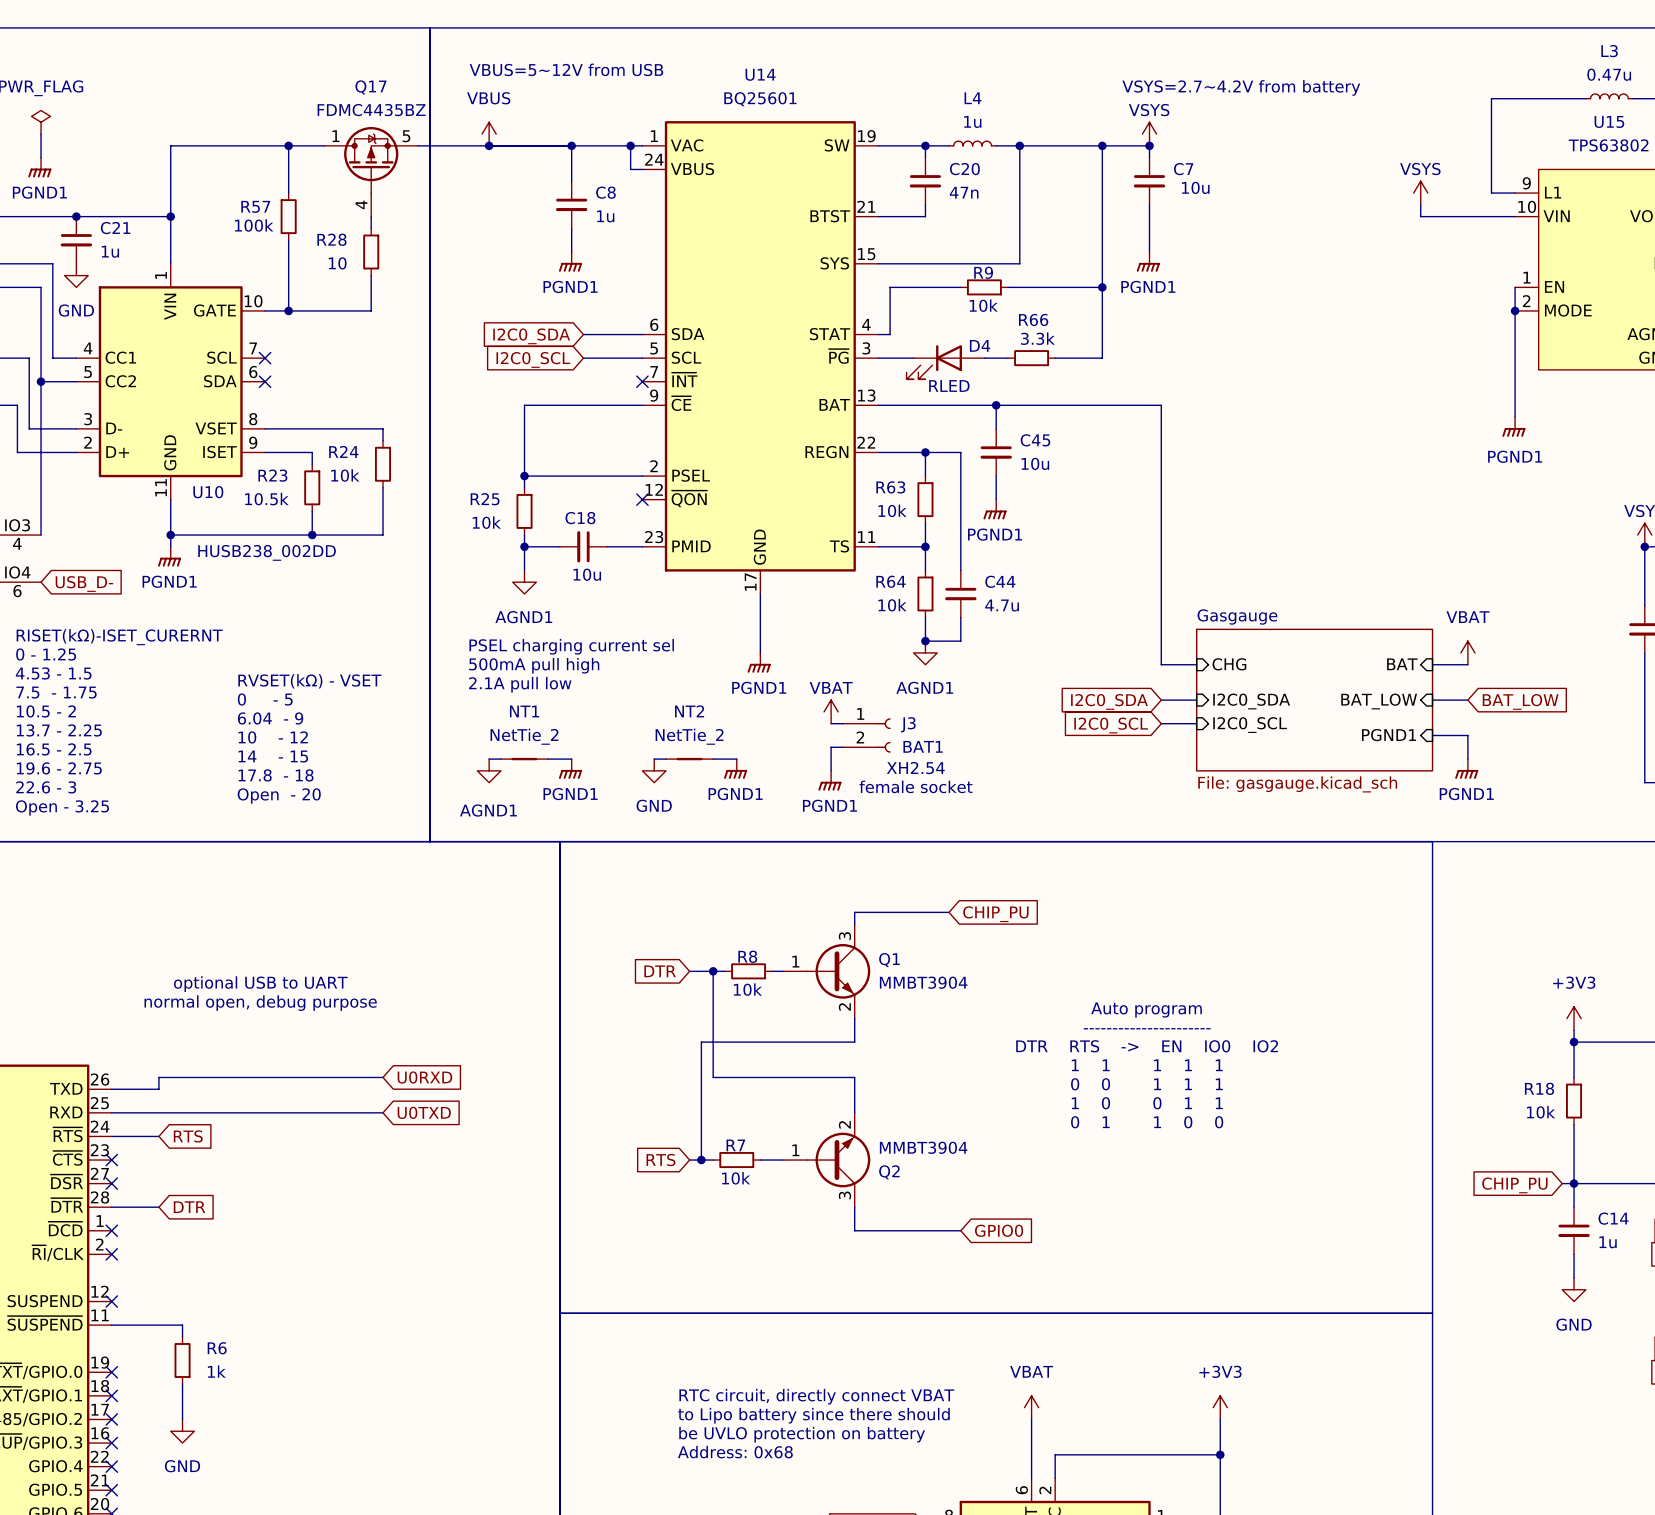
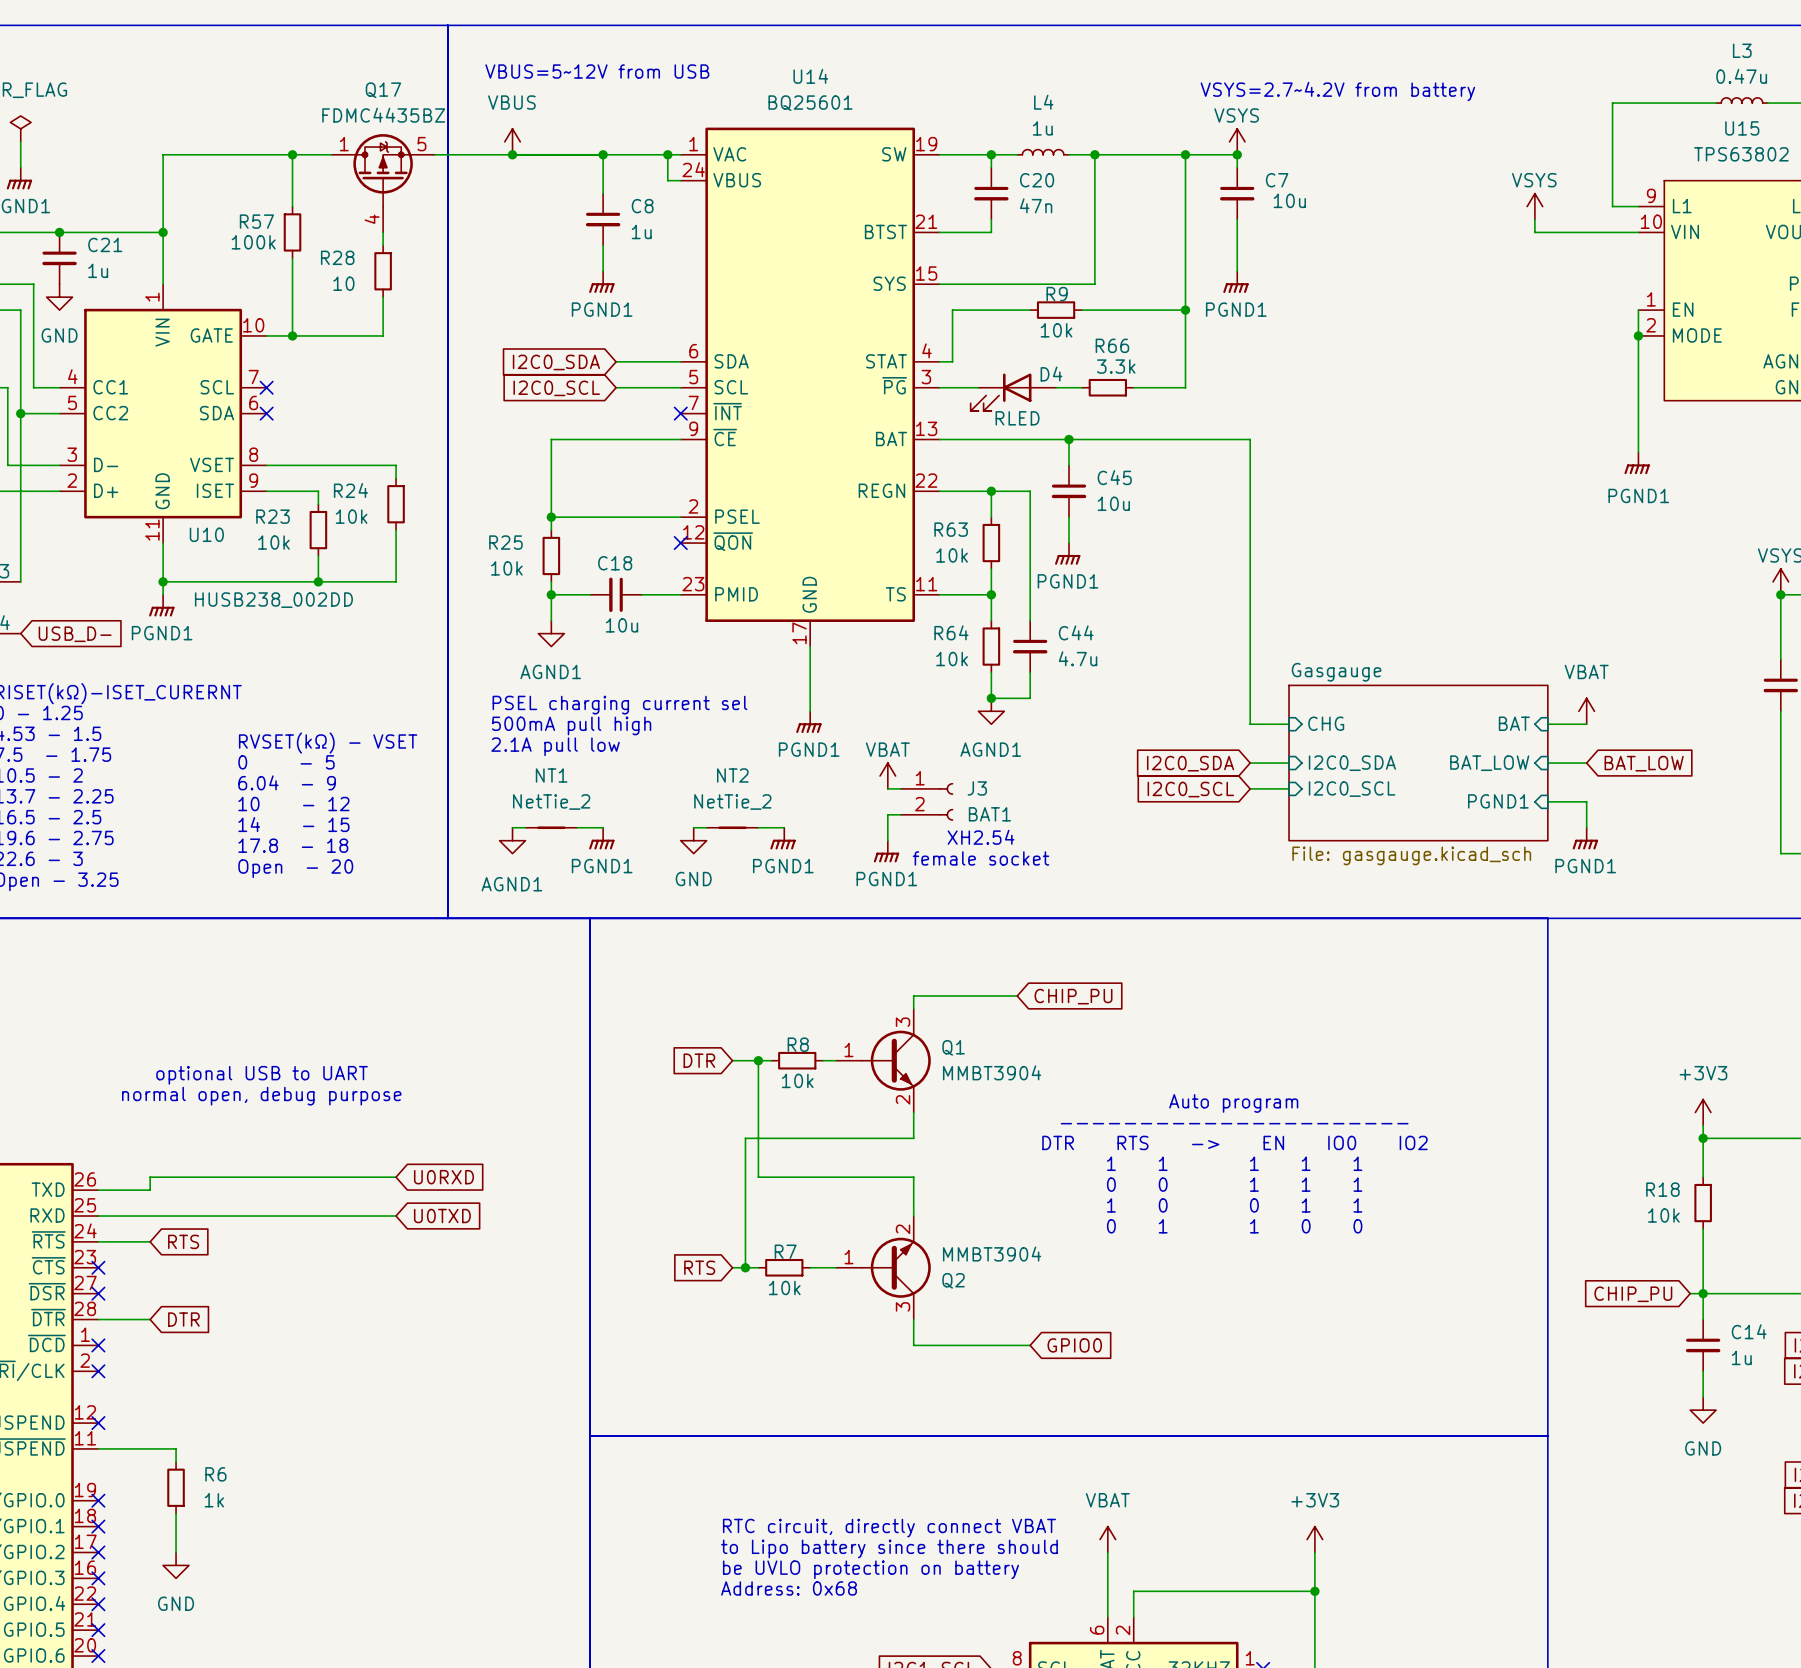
R23 value: 10.5k (266, 499) -> 10k (273, 542)

